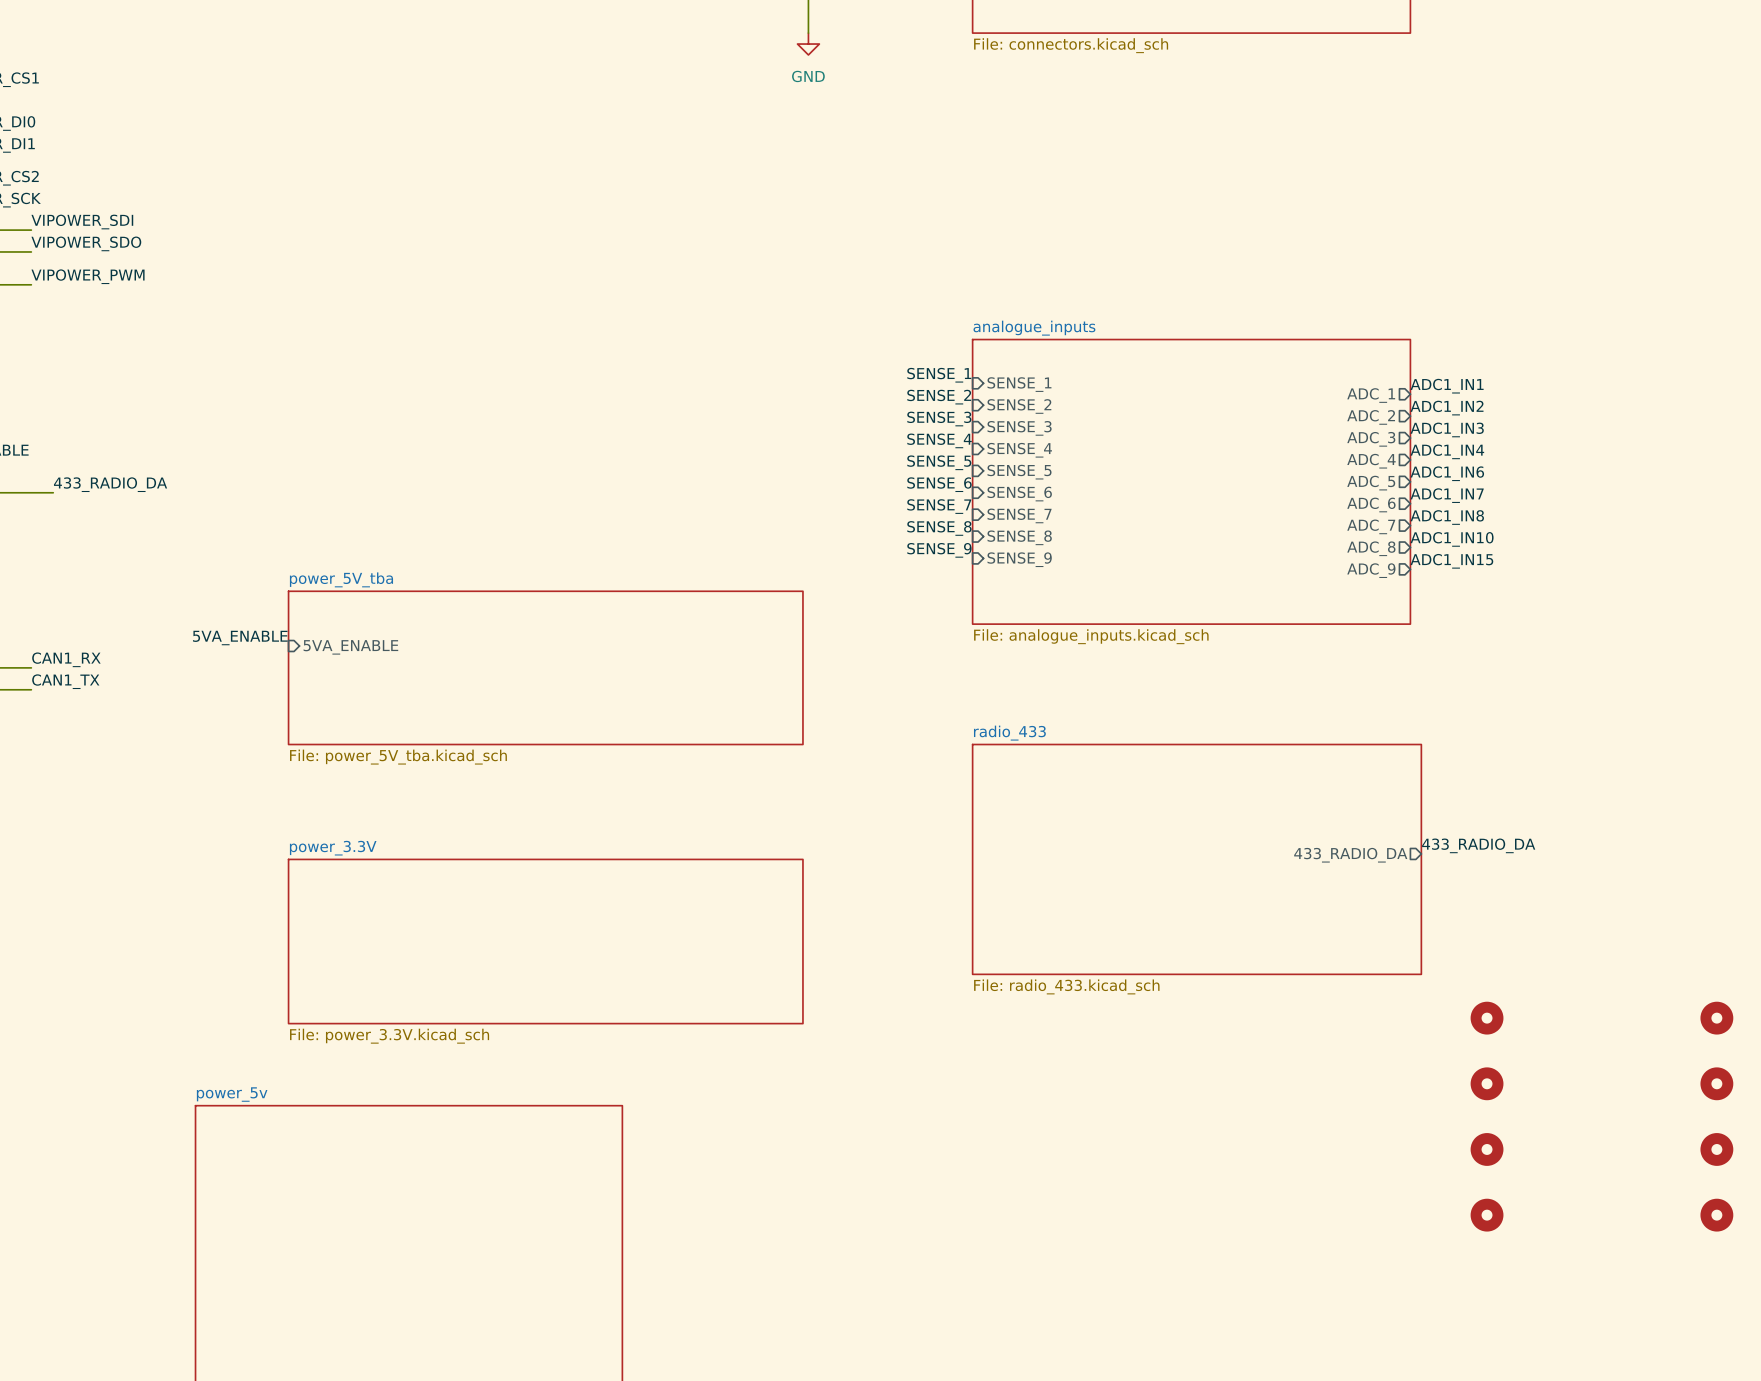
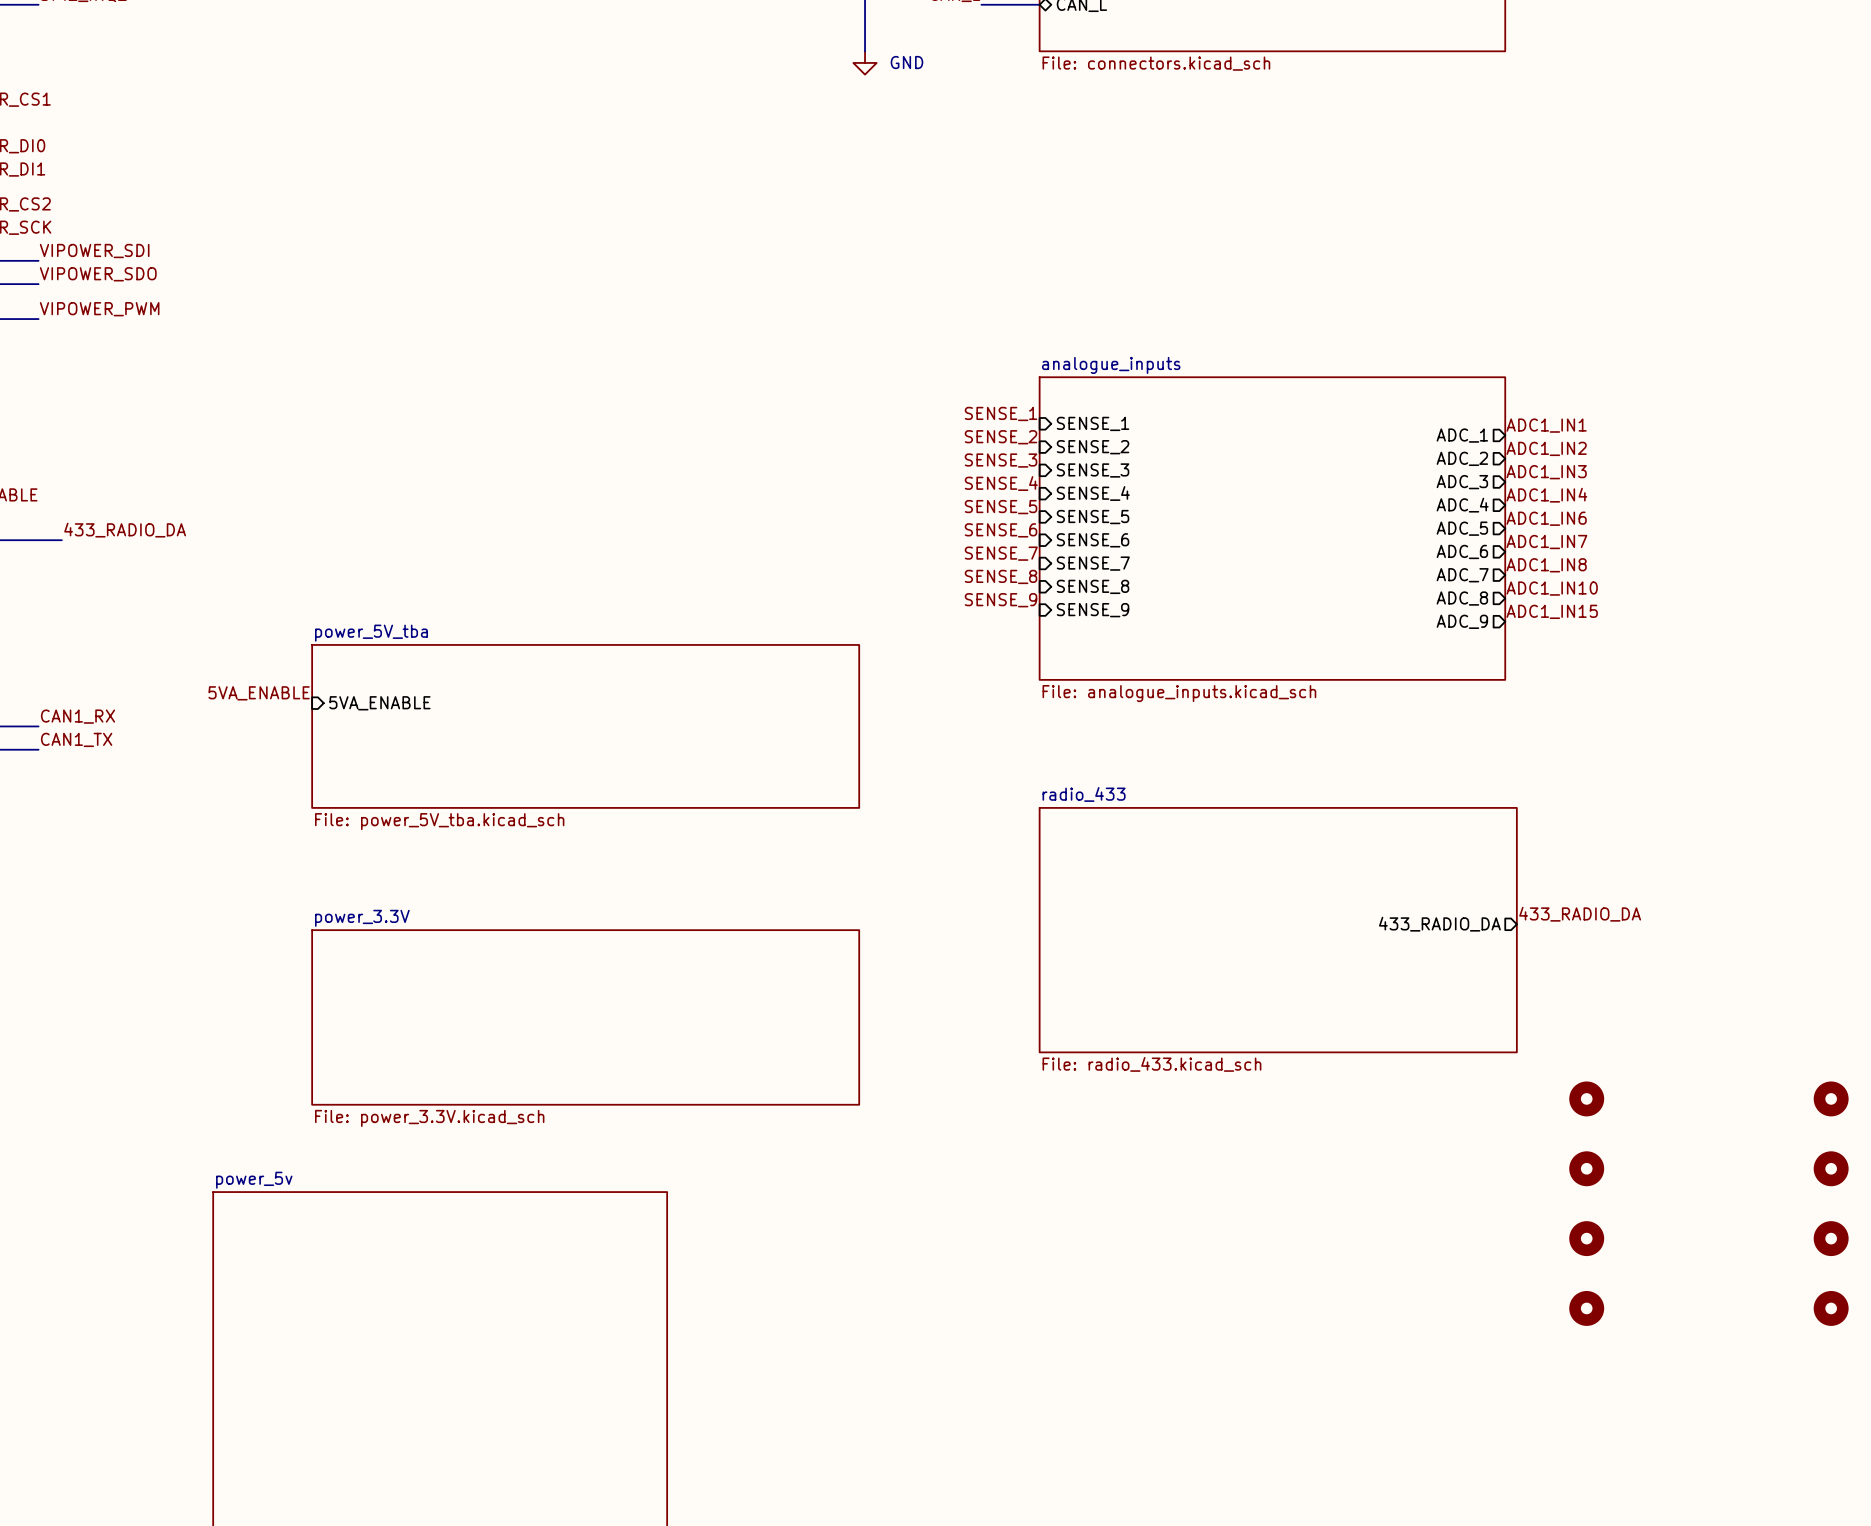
power symbol text position: GND (808, 76) -> GND (906, 62)

